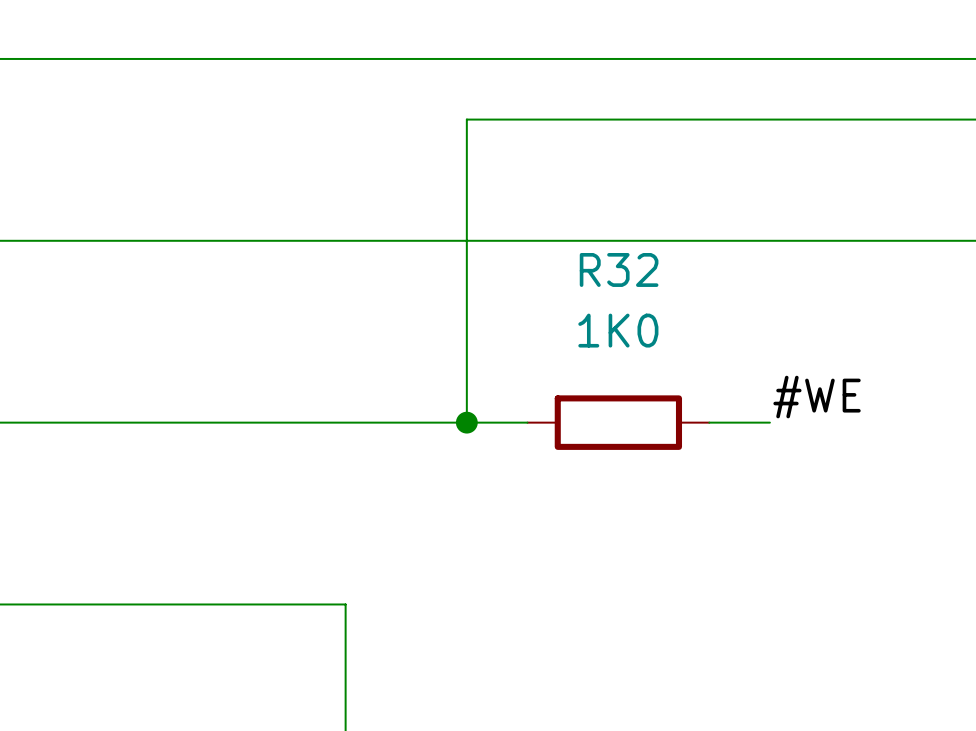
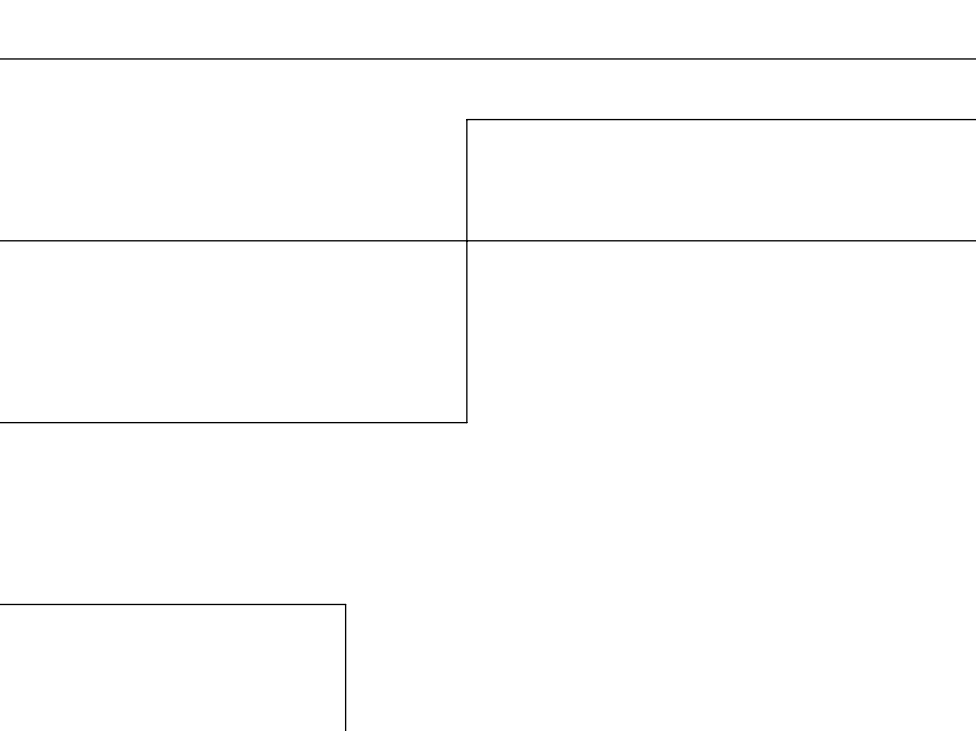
label: #WE (817, 397) -> none
wire: (466, 422) (527, 422) -> none
junction: (466, 422) -> none
R32: 1K0 (618, 422) -> none
wire: (709, 422) (769, 422) -> none

